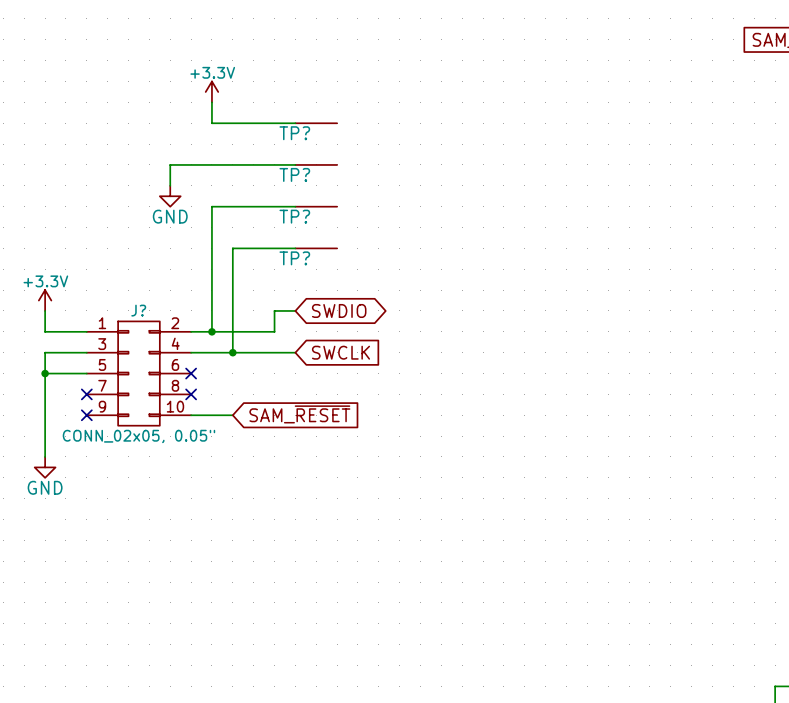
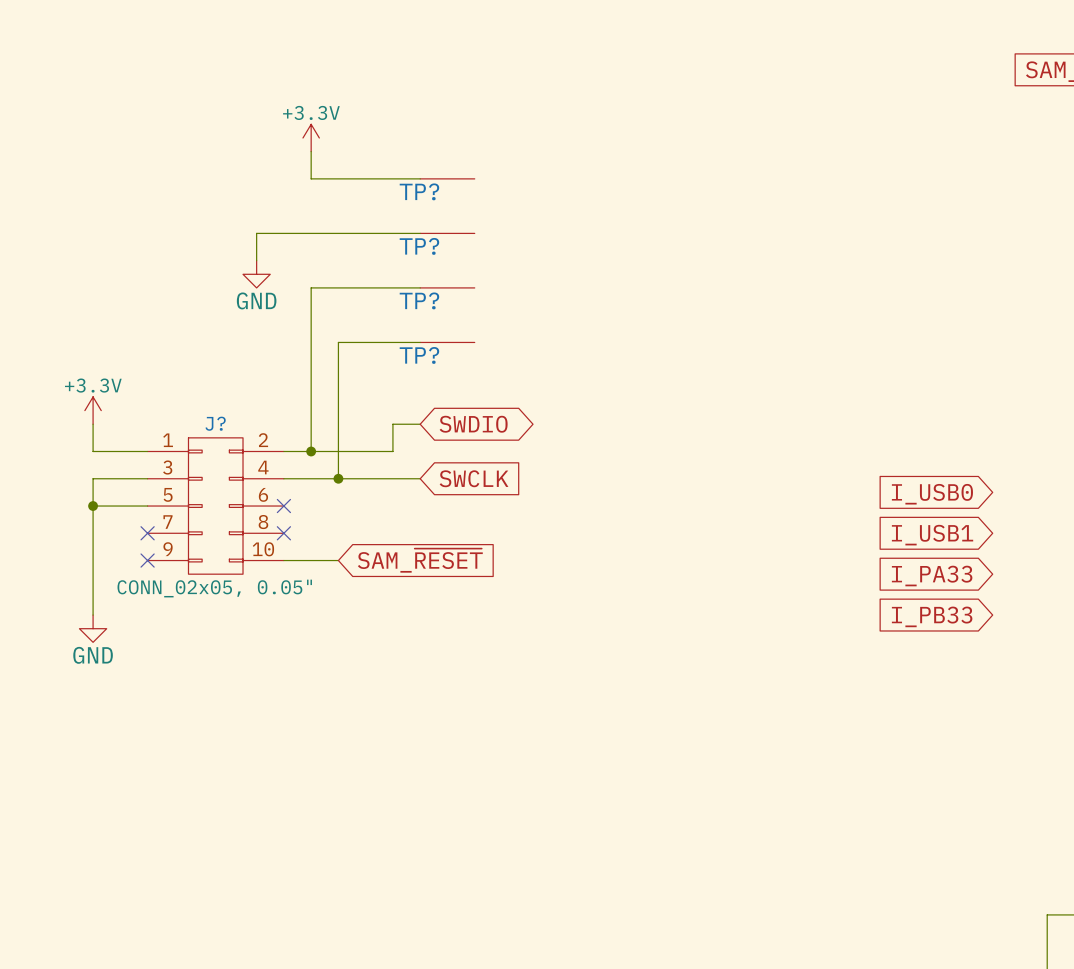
global label: none -> I_USB0 (932, 494)
global label: none -> I_USB1 (932, 535)
global label: none -> I_PA33 (932, 576)
global label: none -> I_PB33 (932, 616)

